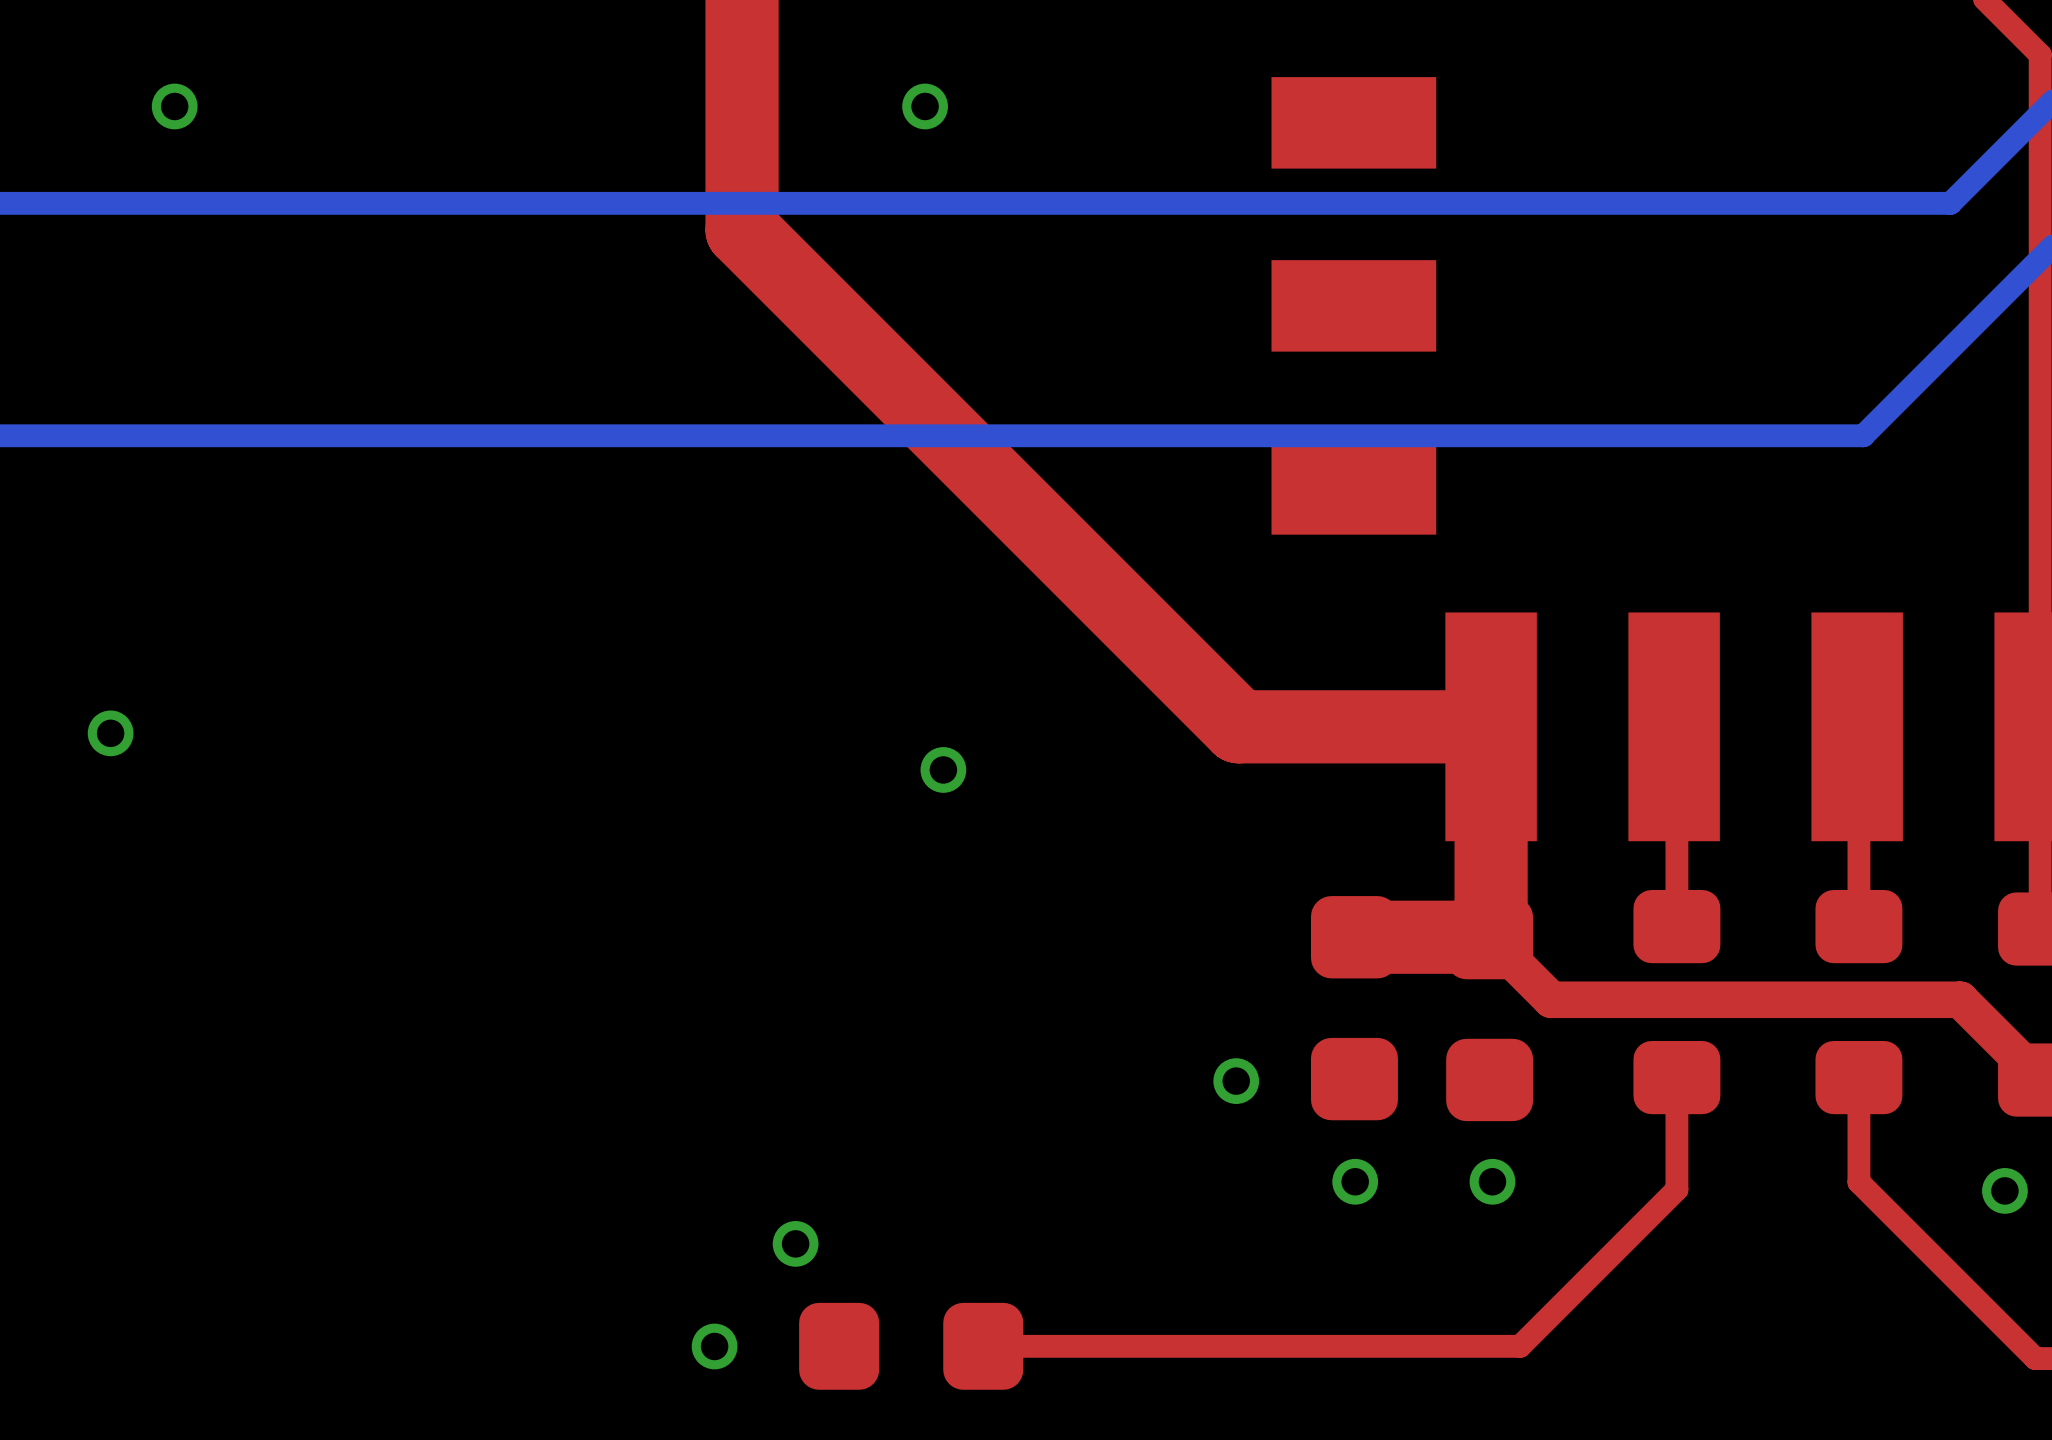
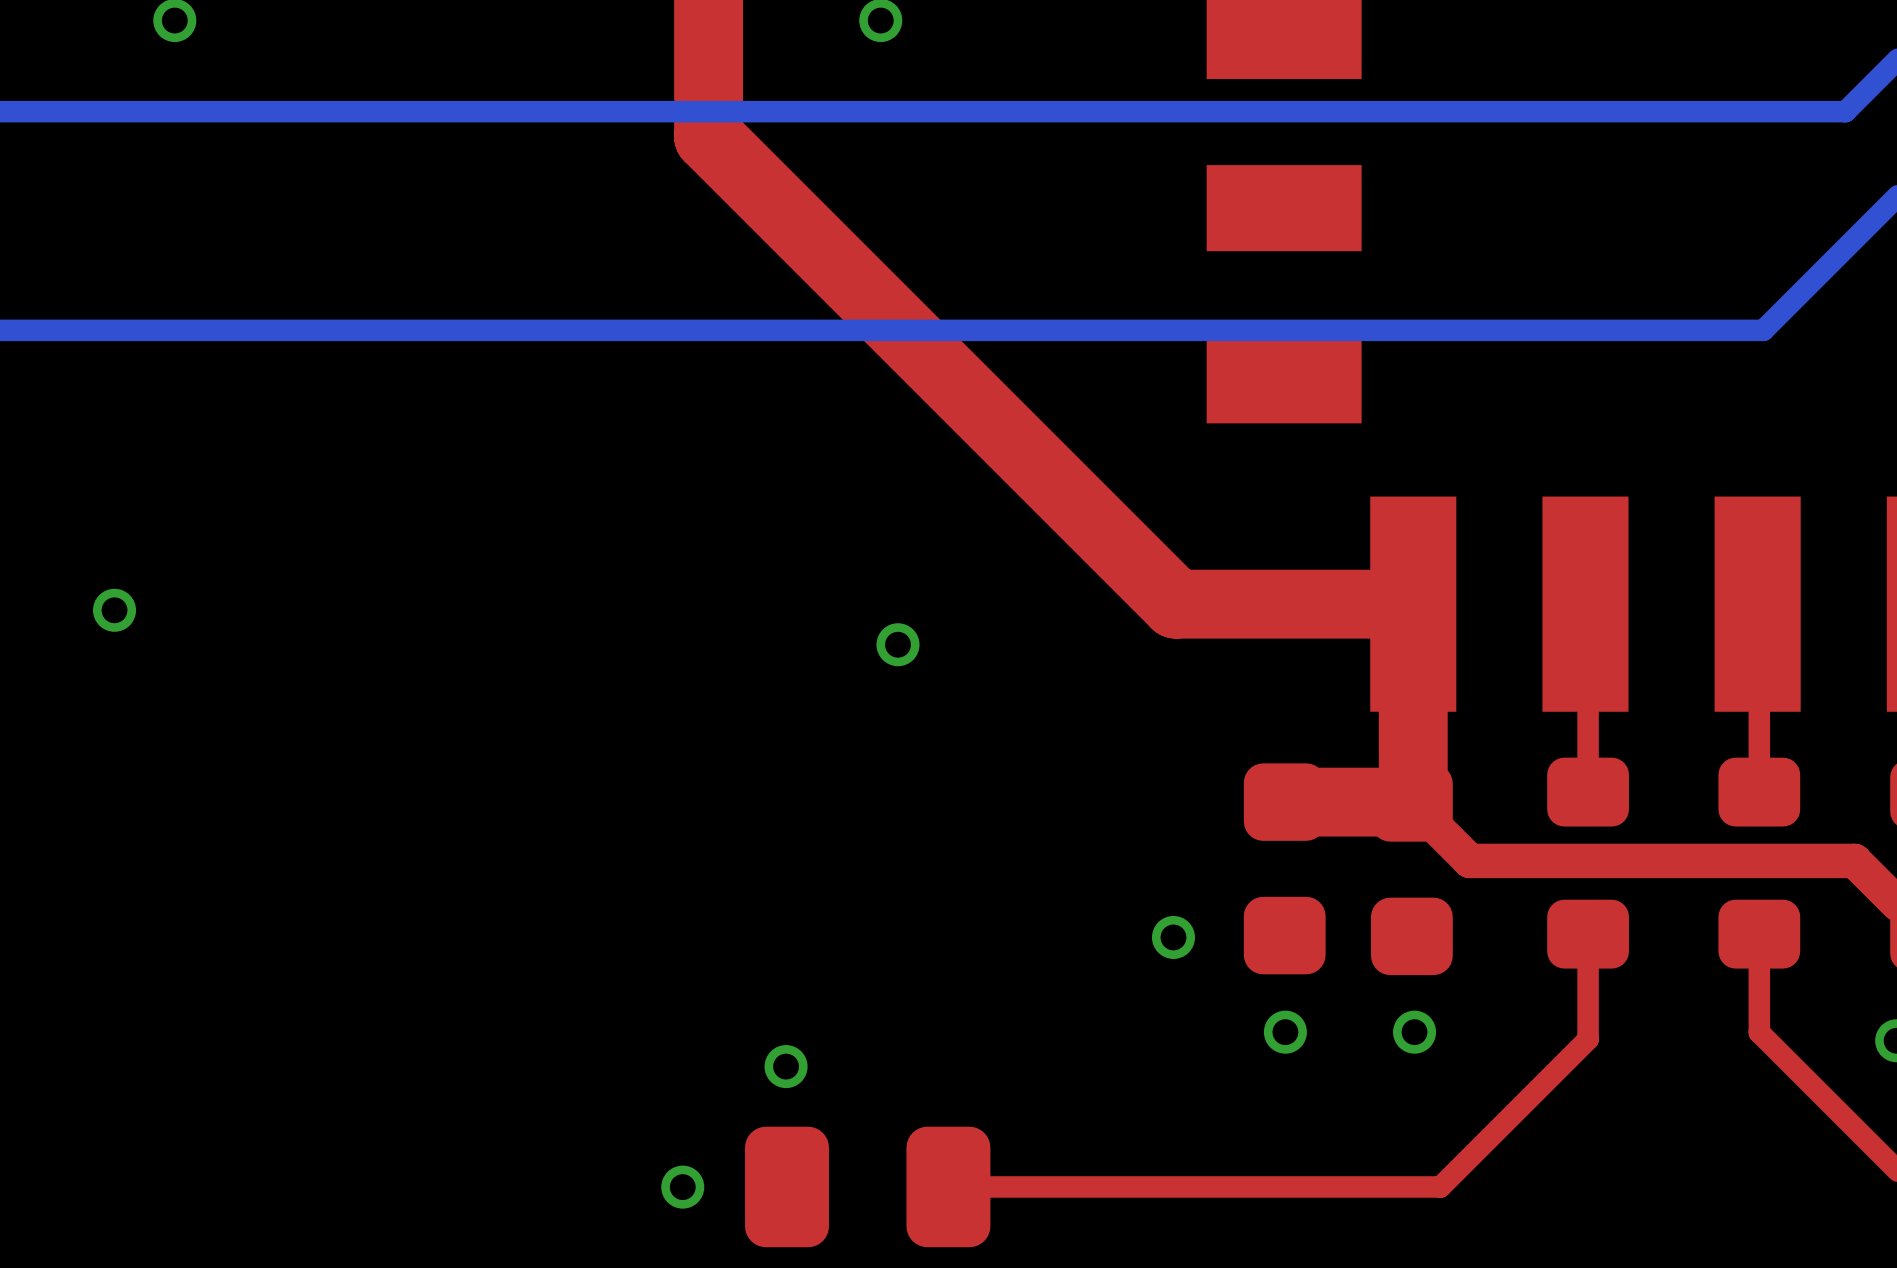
via position: (795, 1243) -> (786, 1066)
part footprint: [799, 1302, 1024, 1390] -> [745, 1126, 991, 1248]

